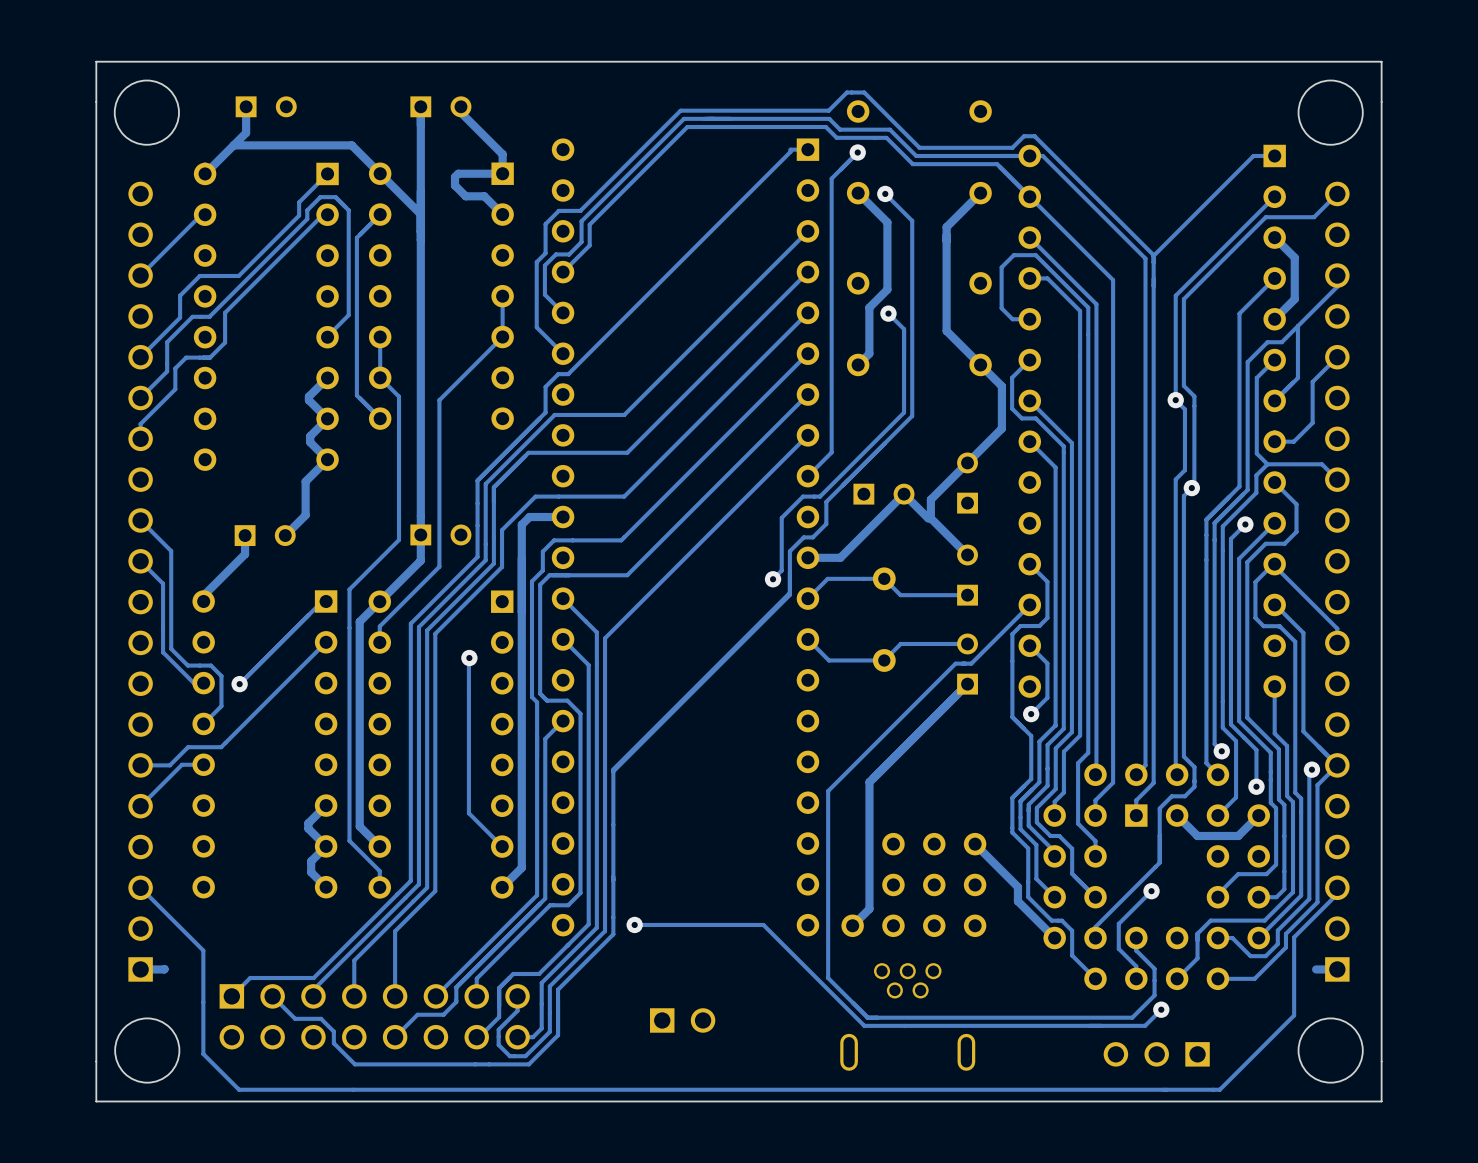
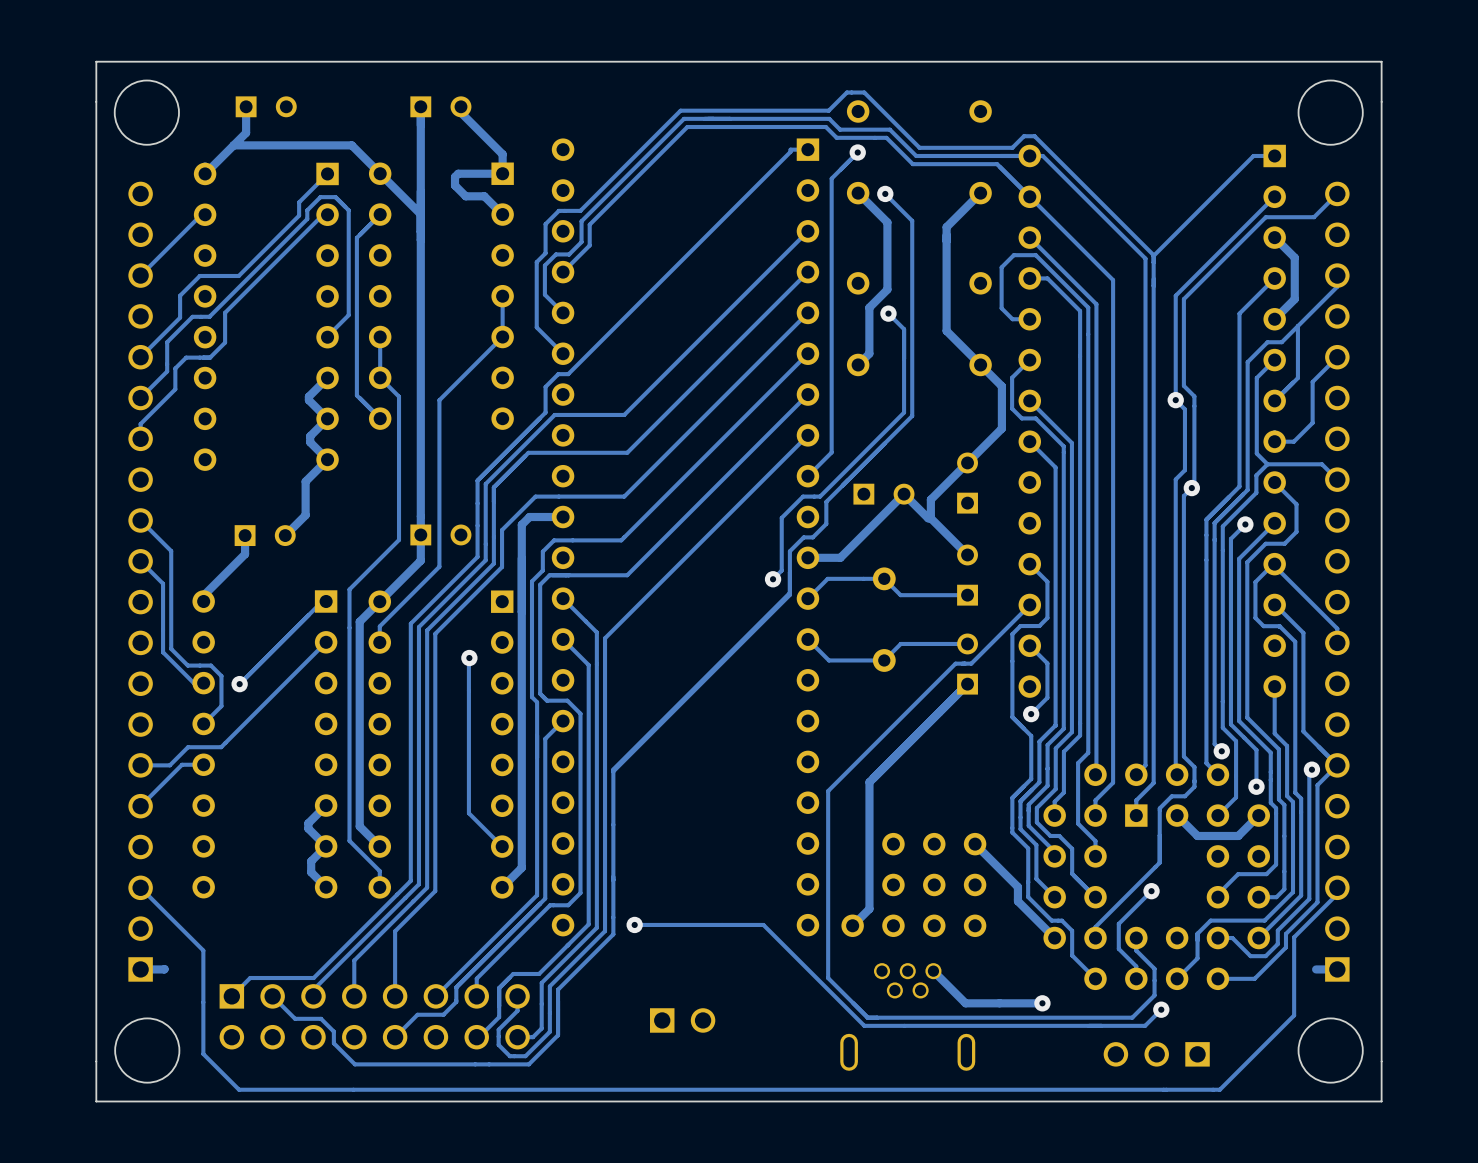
track: none -> (933, 971) (965, 1003) (1042, 1003)
via: none -> (1042, 1003)

